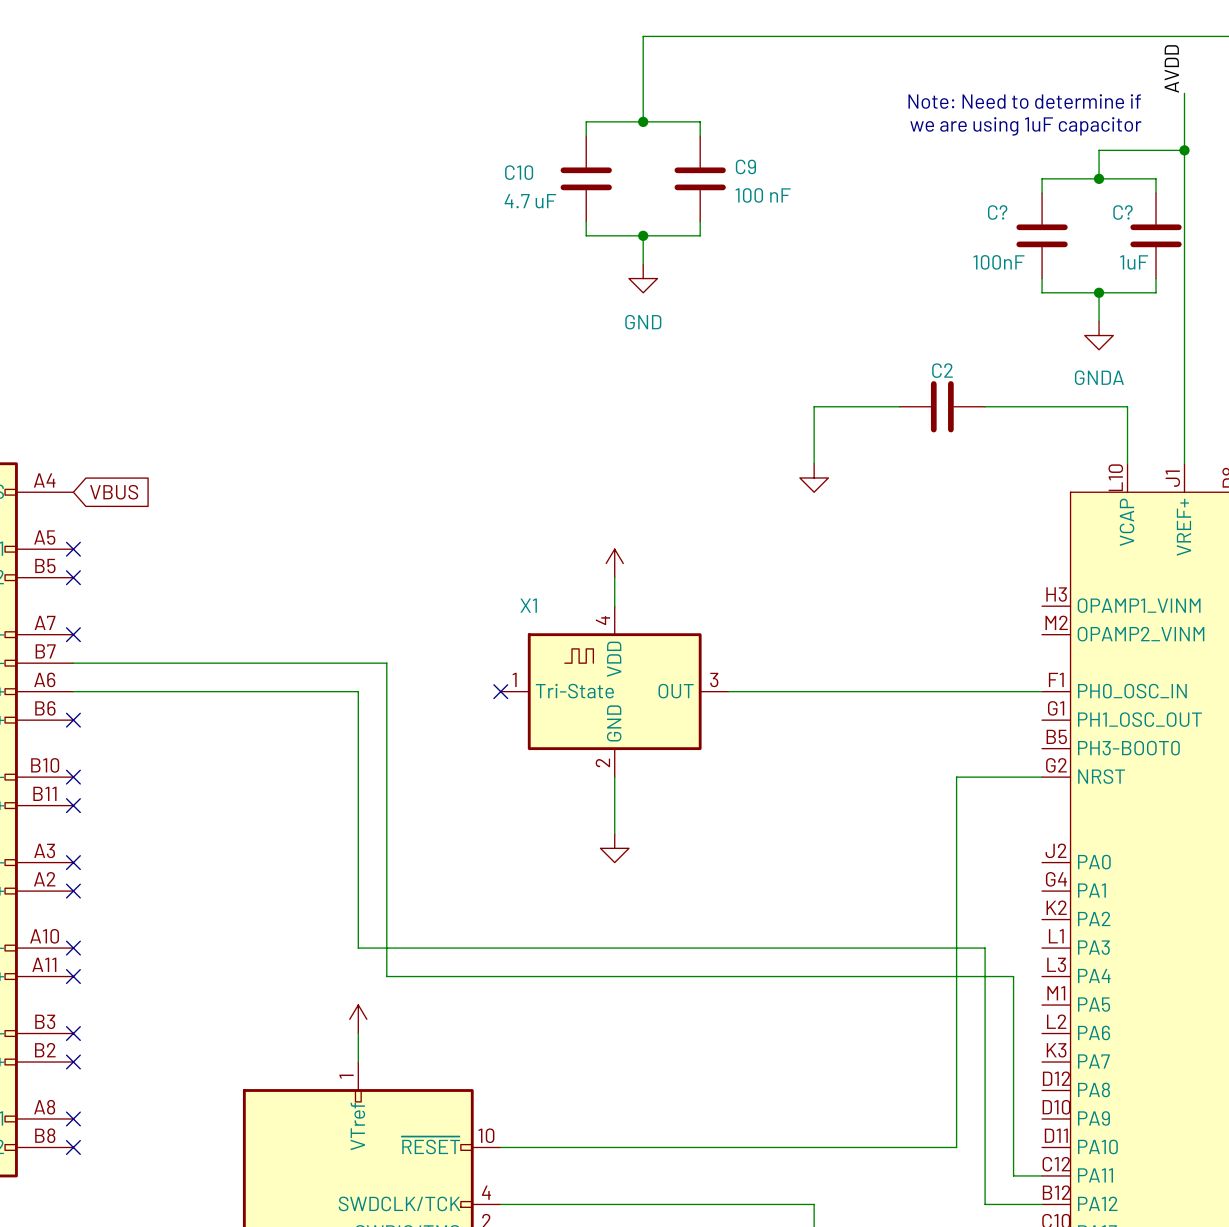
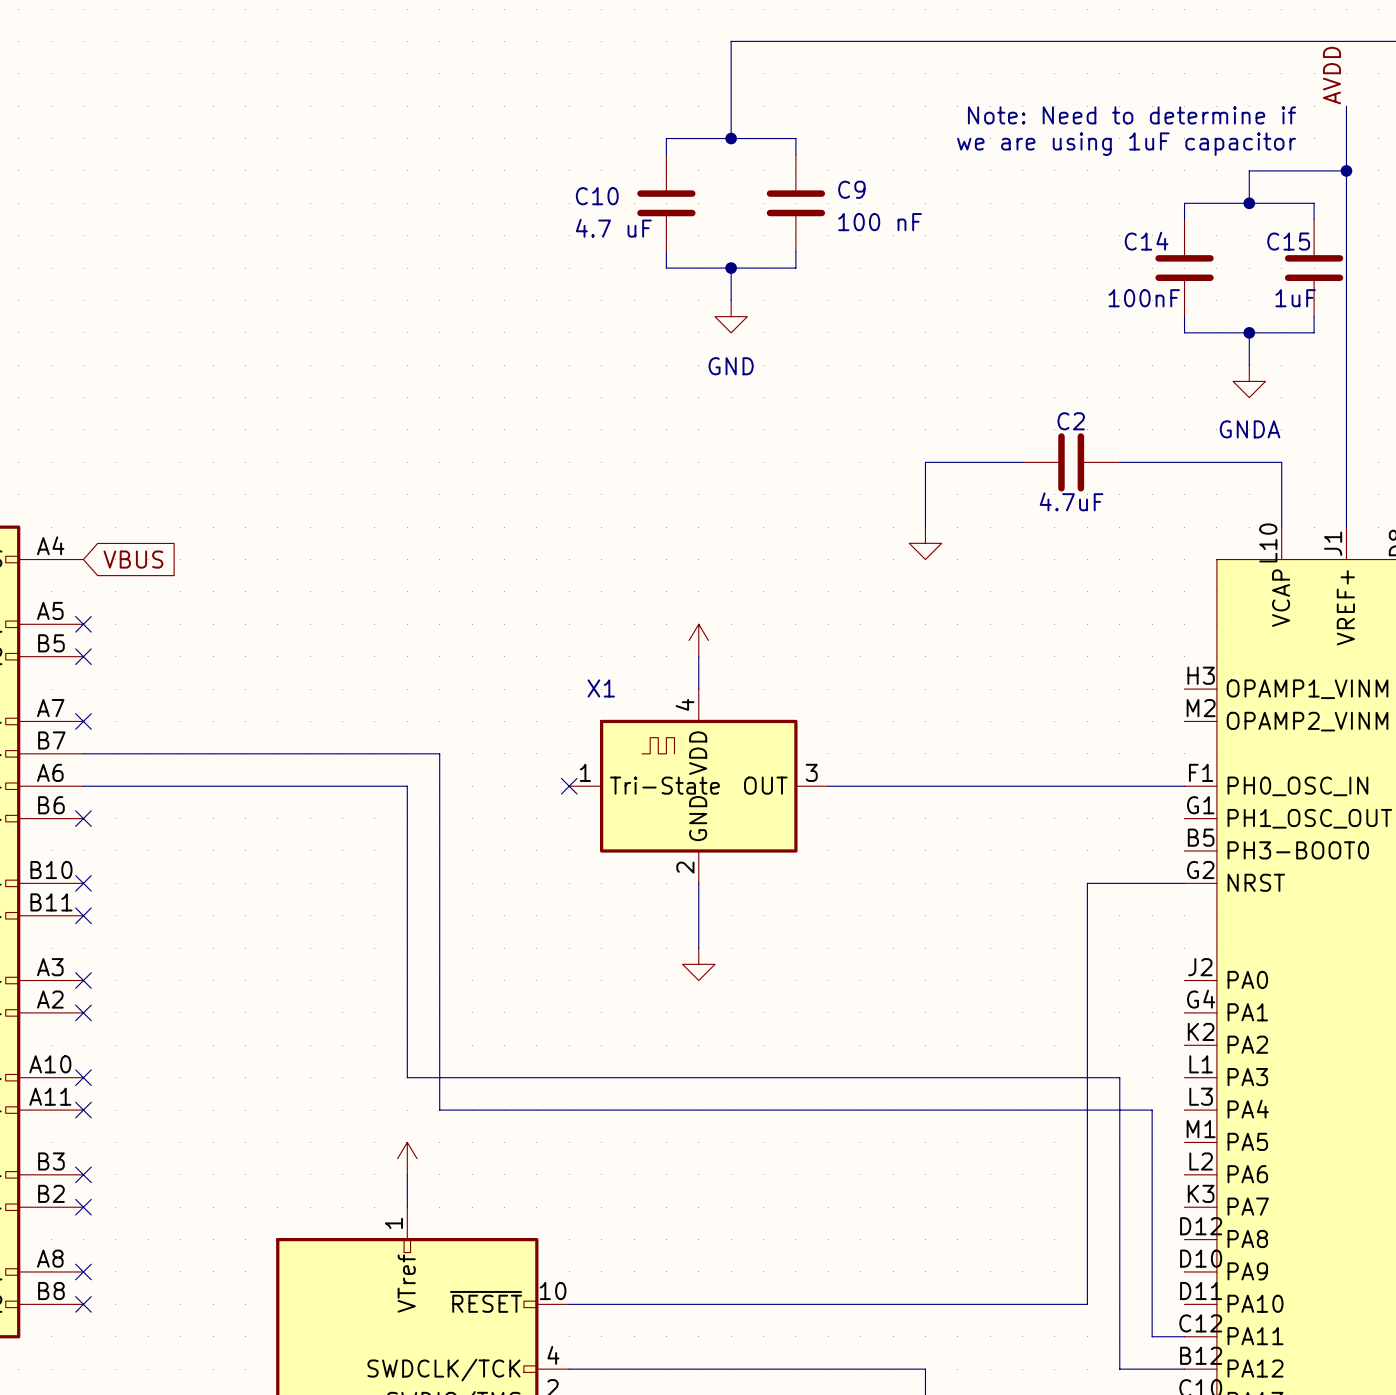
C? name: C? (997, 212) -> C14 (1146, 241)
C? name: C? (1123, 212) -> C15 (1288, 241)
C2 value: none -> 4.7uF (1071, 501)

